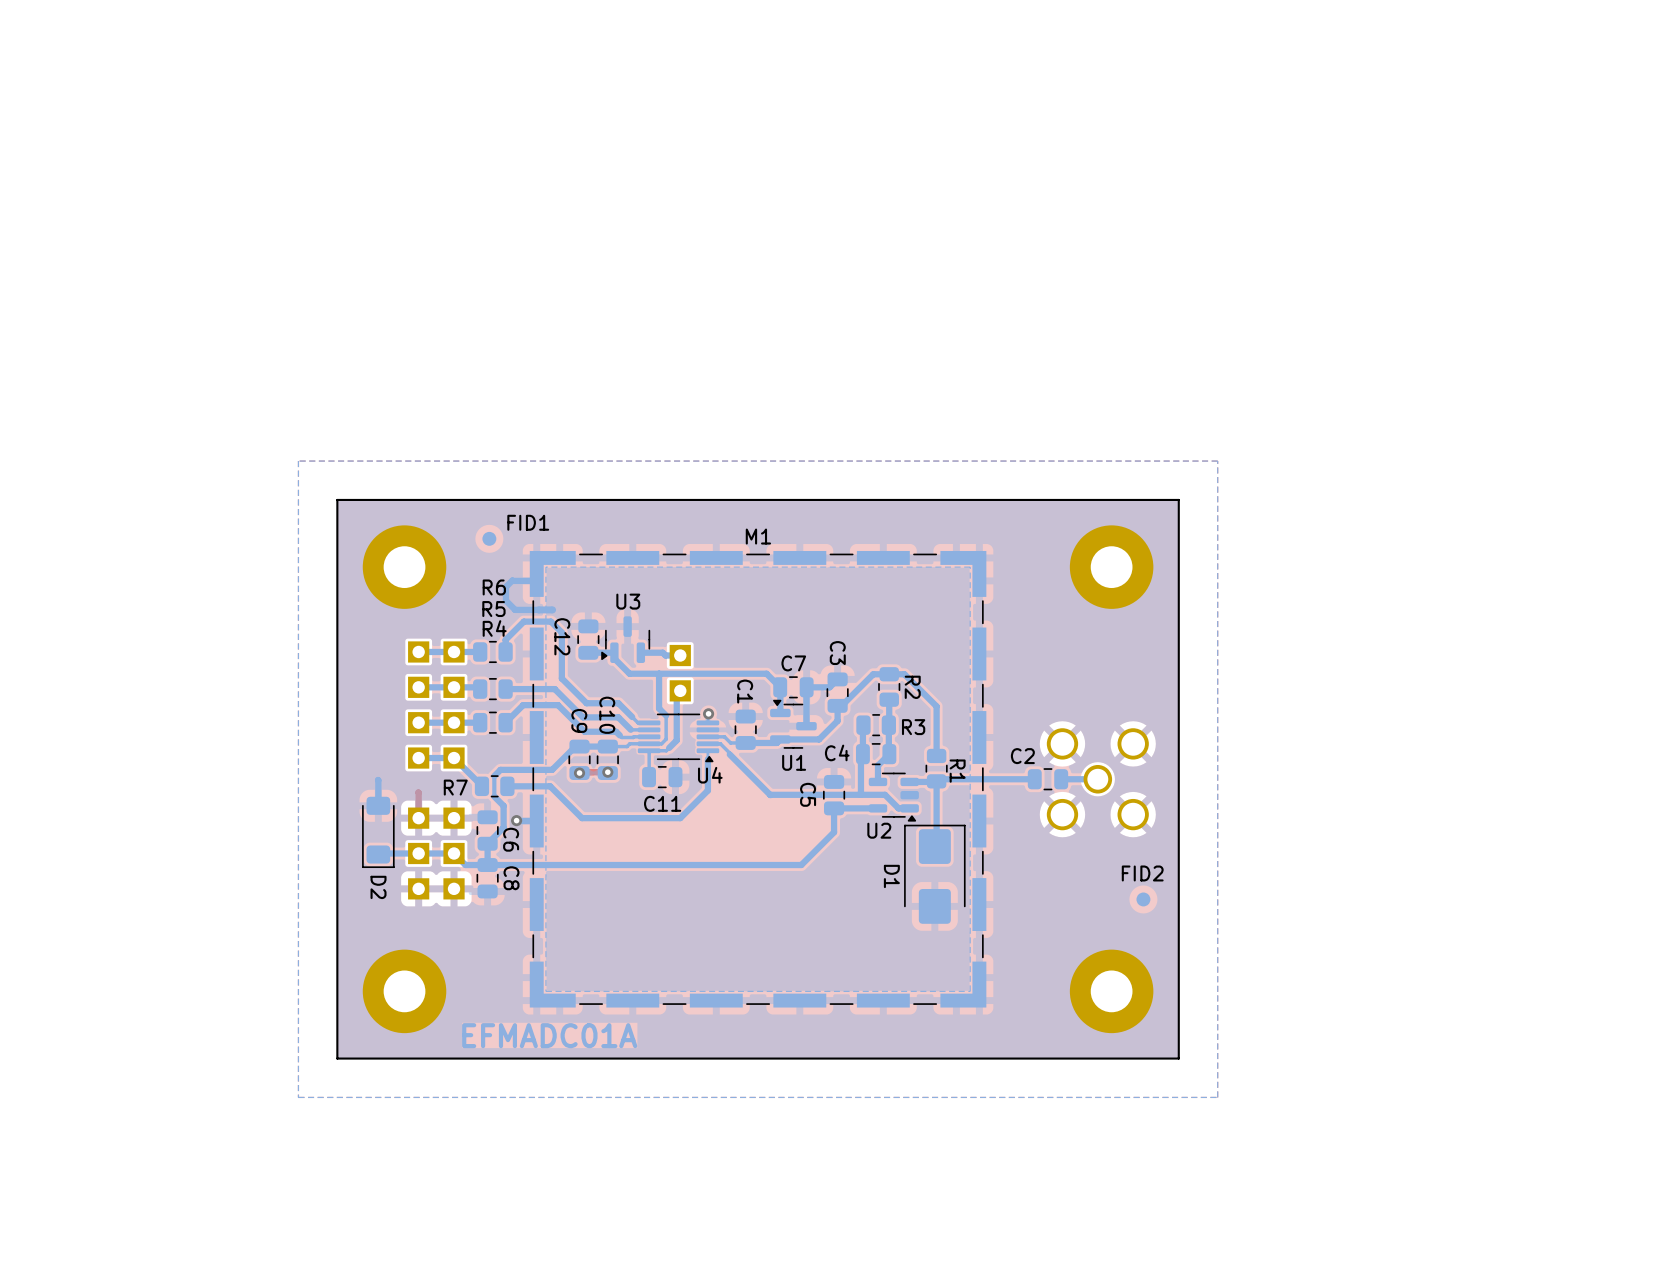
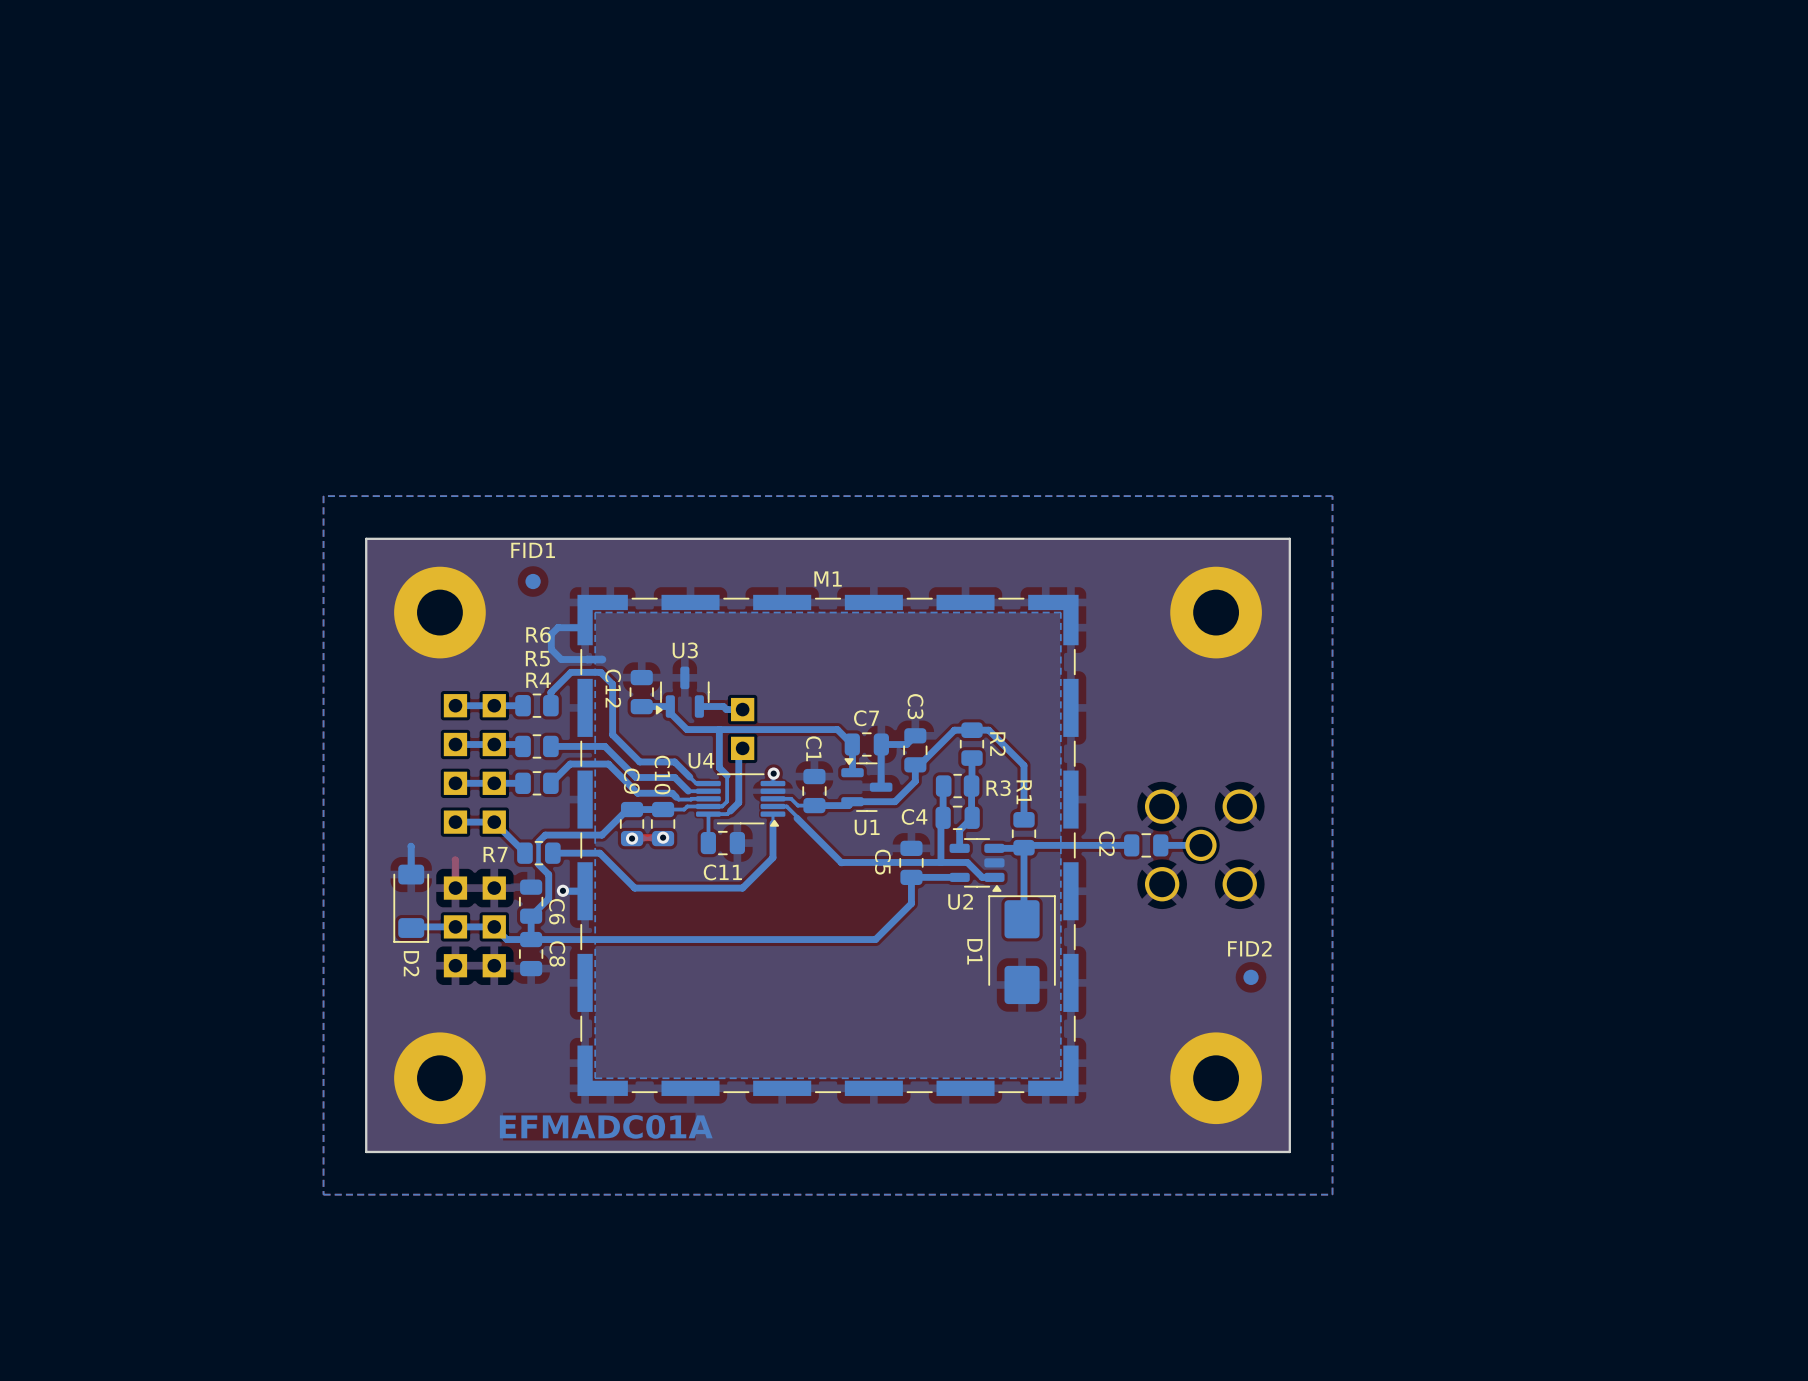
FID1 name position: FID1 (528, 522) -> FID1 (533, 550)
C2 name rotation: 0° (1022, 756) -> 90° clockwise (1106, 843)
R1 name position: R1 (957, 771) -> R1 (1024, 792)
U4 name position: U4 (710, 775) -> U4 (701, 760)

